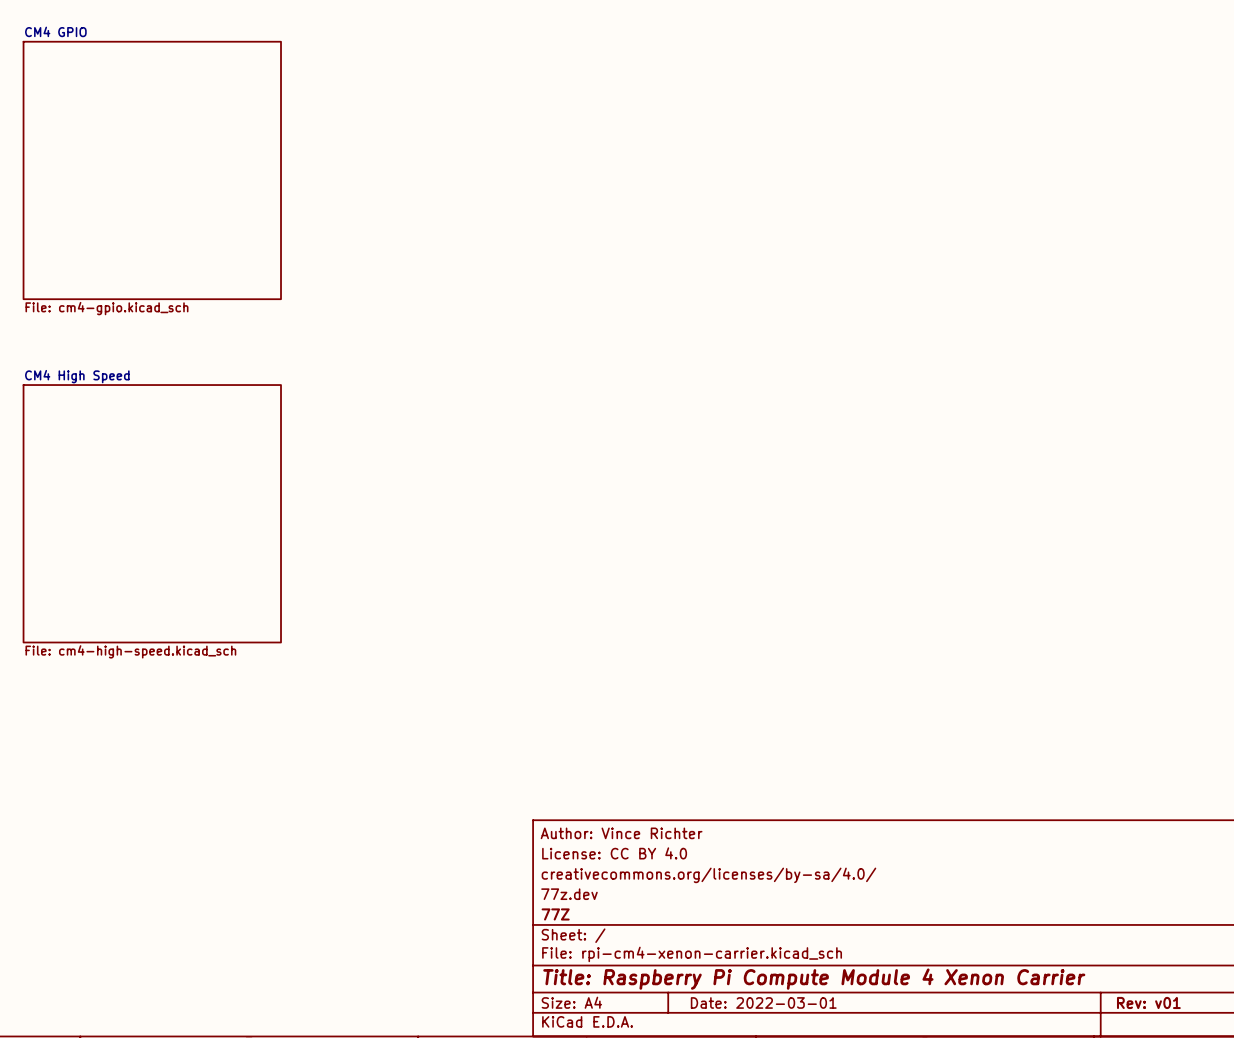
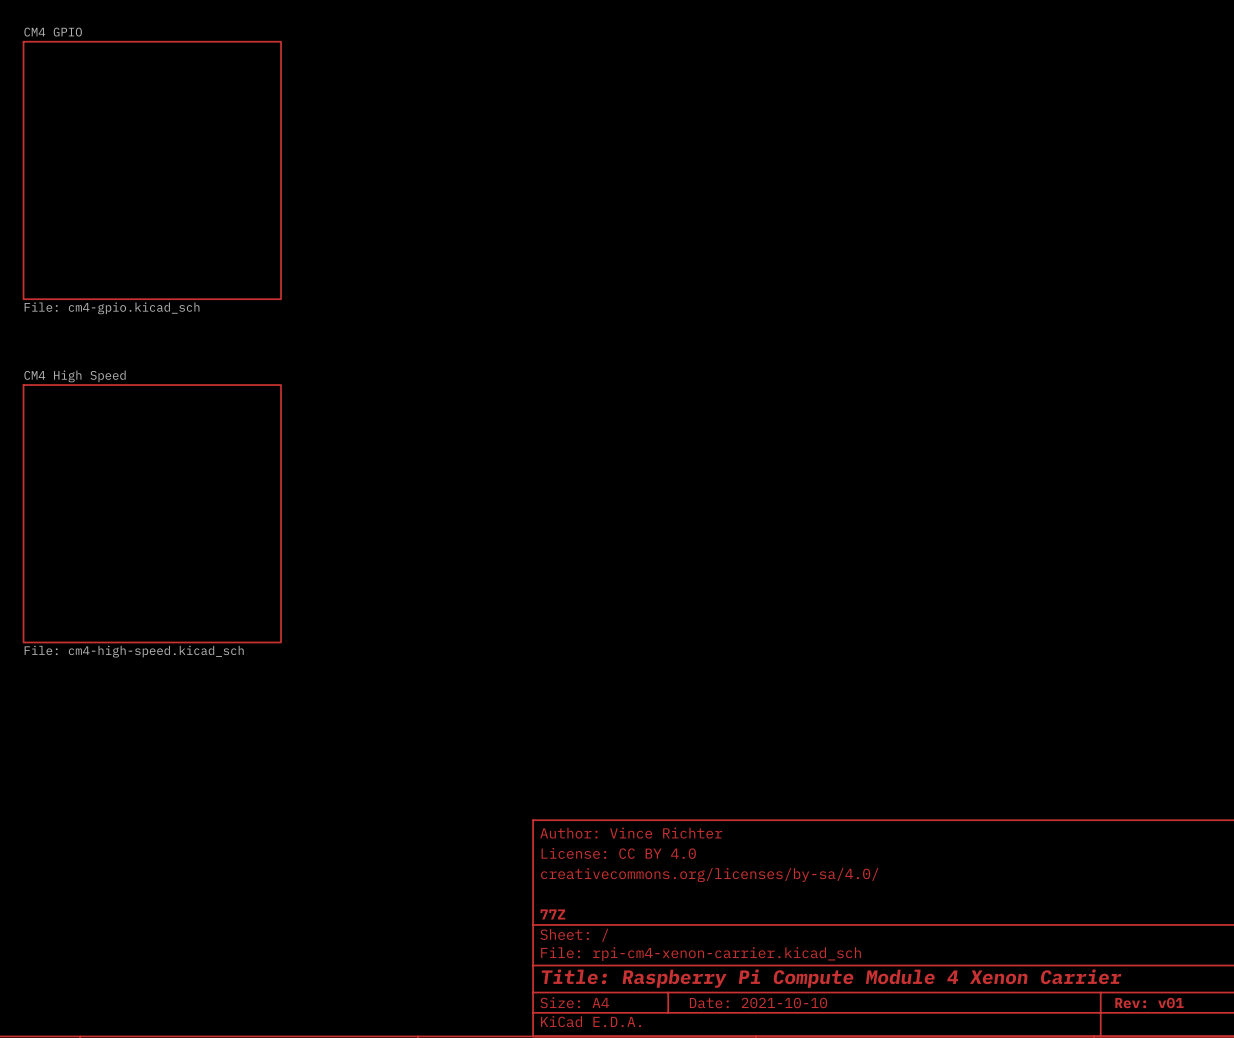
title block: 77z.dev (569, 894) -> none
title block: Date: 2022-03-01 (763, 1002) -> Date: 2021-10-10 (758, 1002)

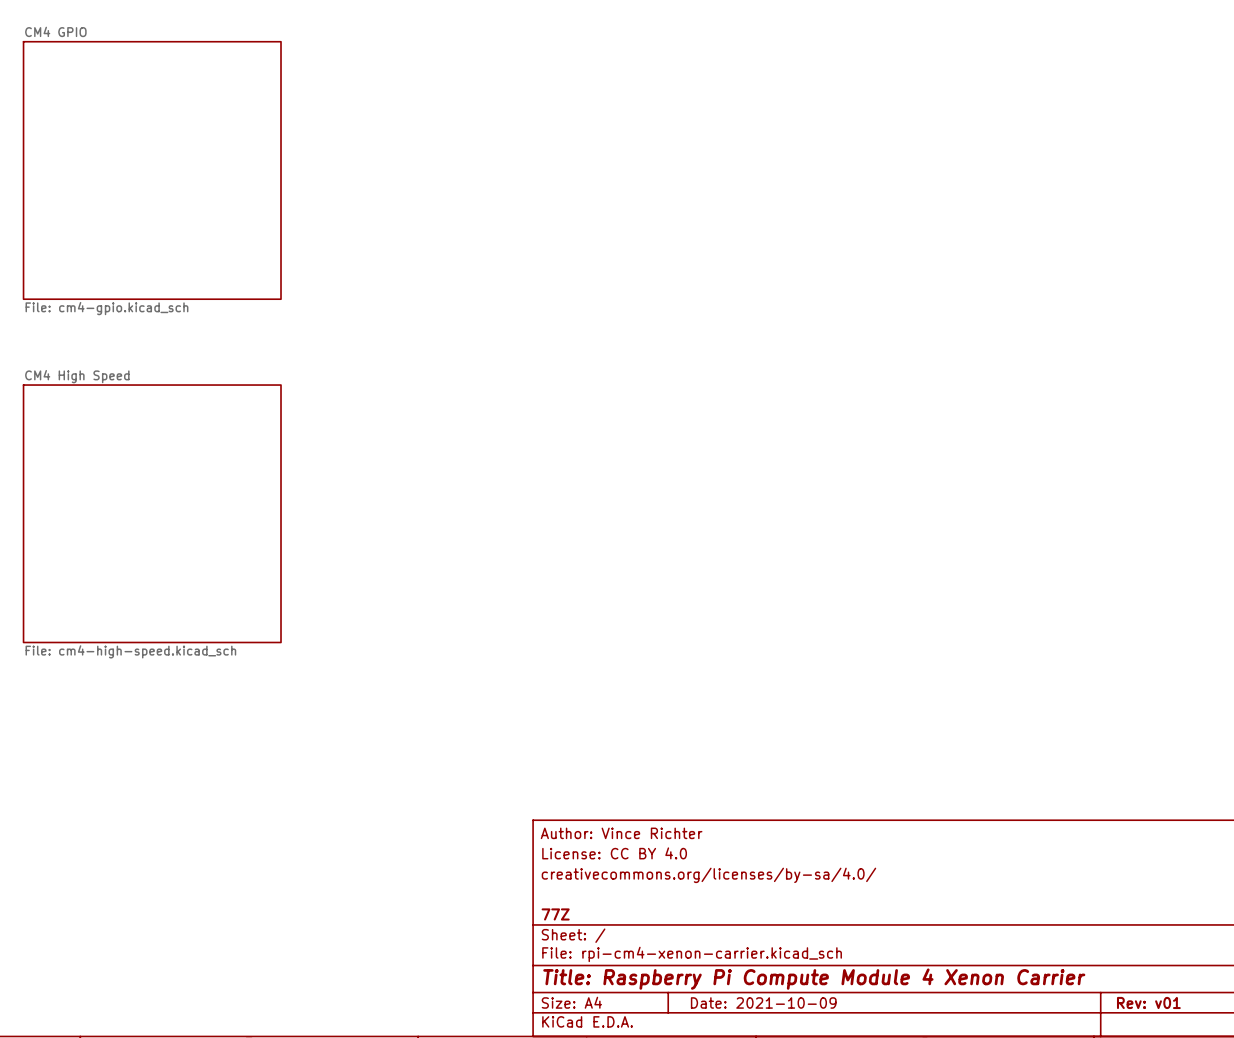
title block: Date: 2021-10-10 (758, 1002) -> Date: 2021-10-09 (763, 1002)

